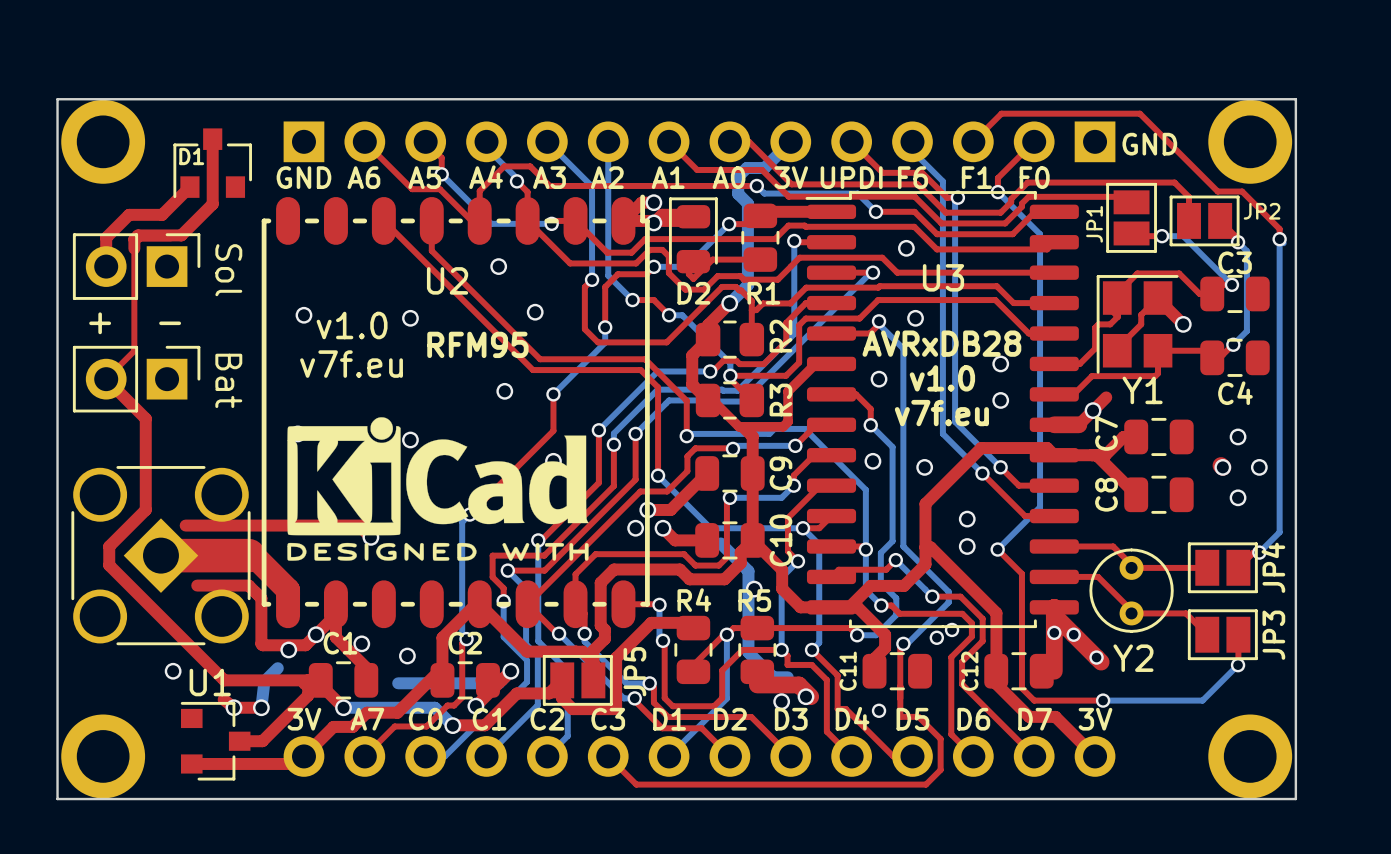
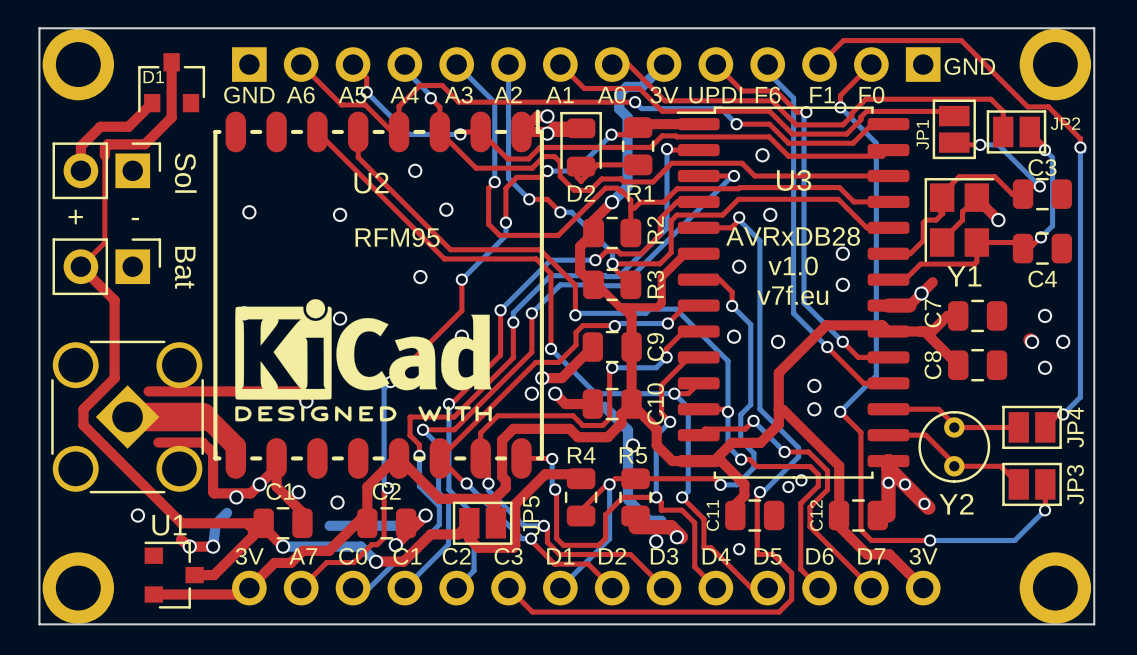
text: v1.0 (352, 325) -> none
text: v7f.eu (351, 364) -> none

